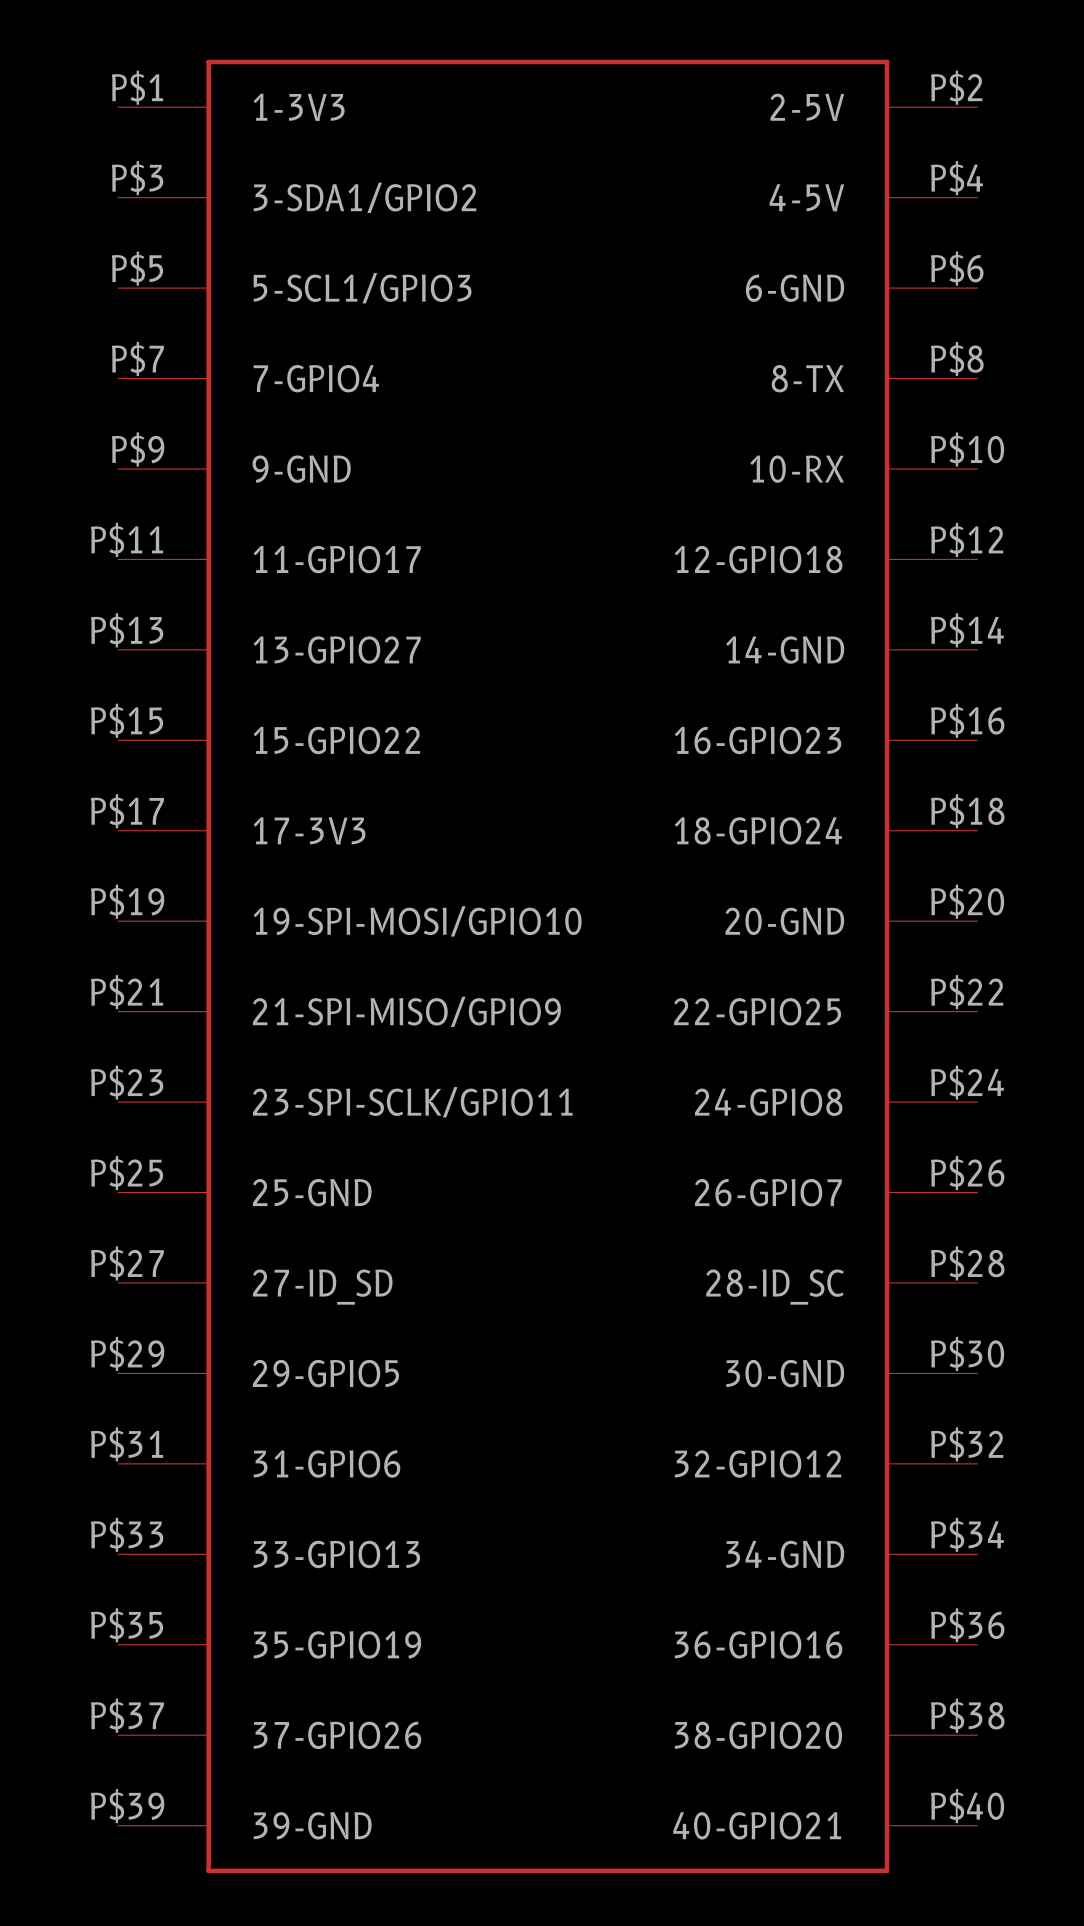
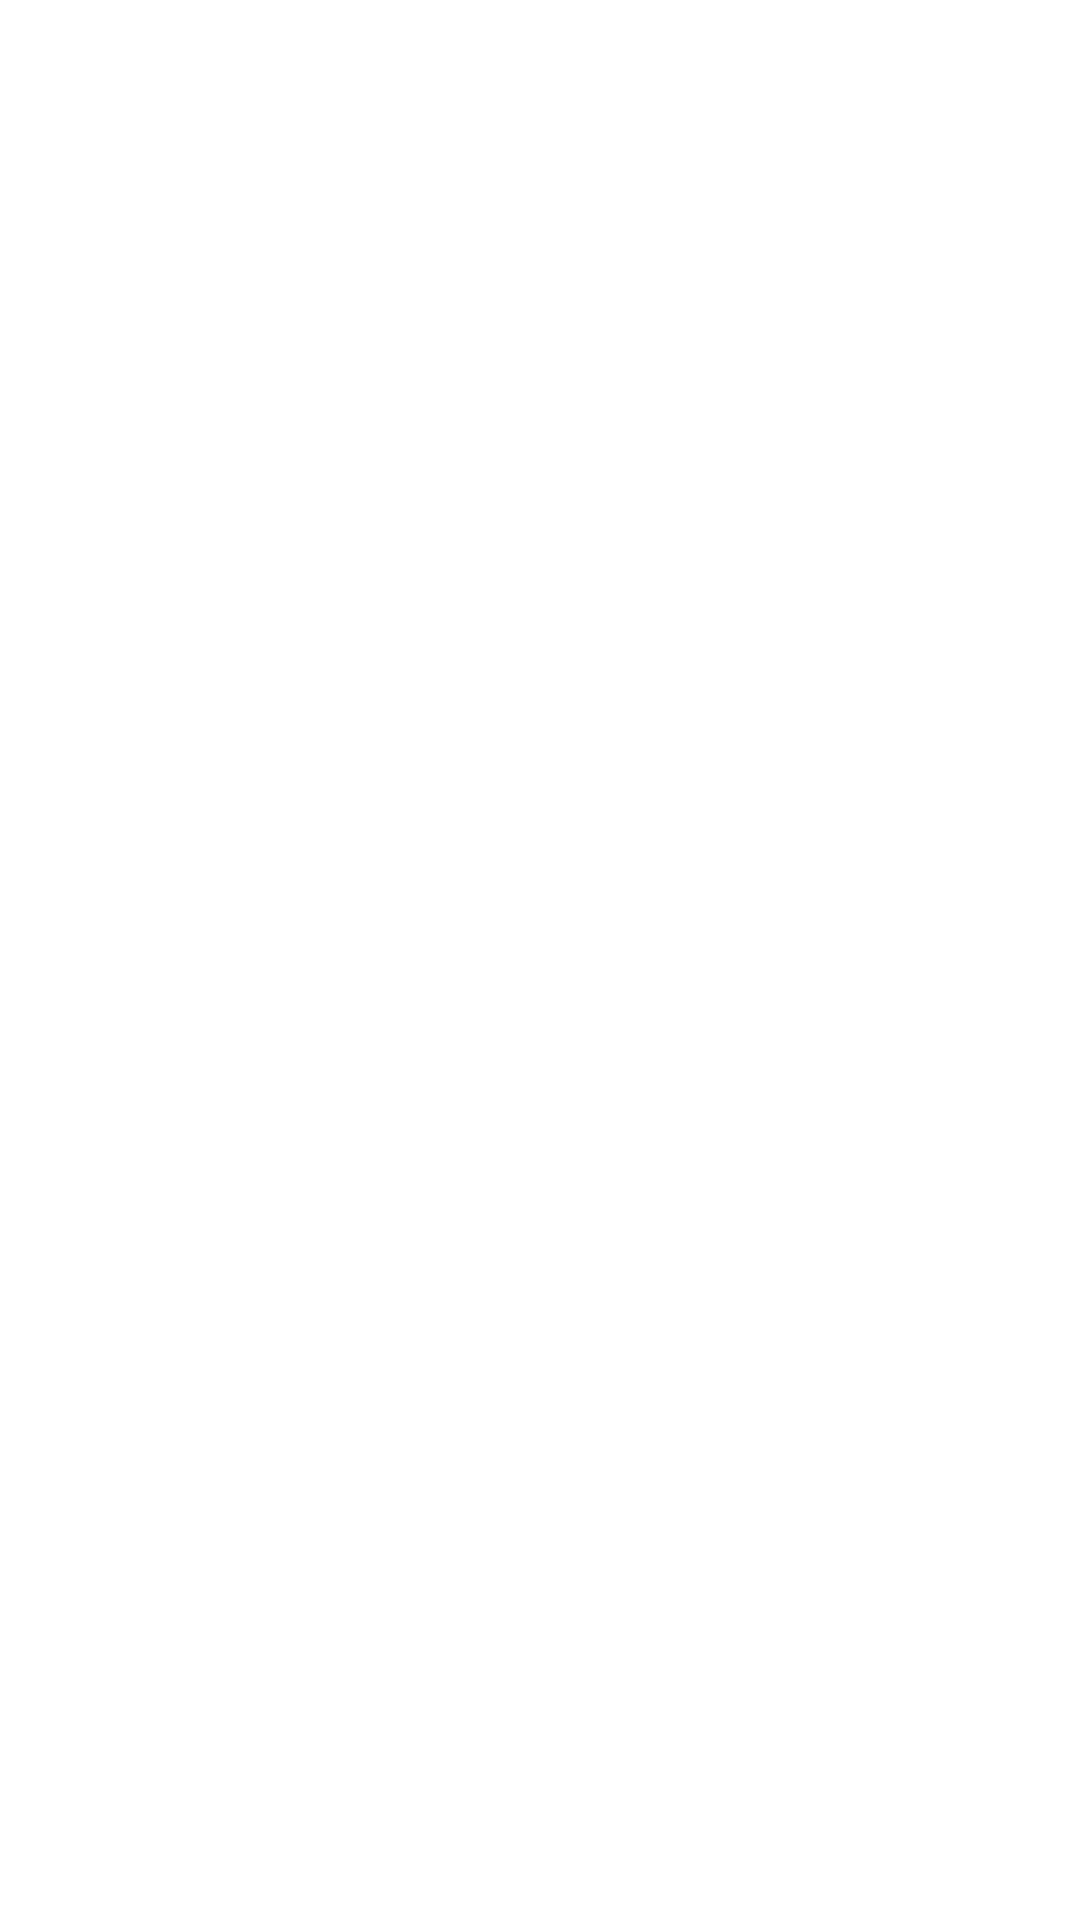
part: (547, 966) -> none

